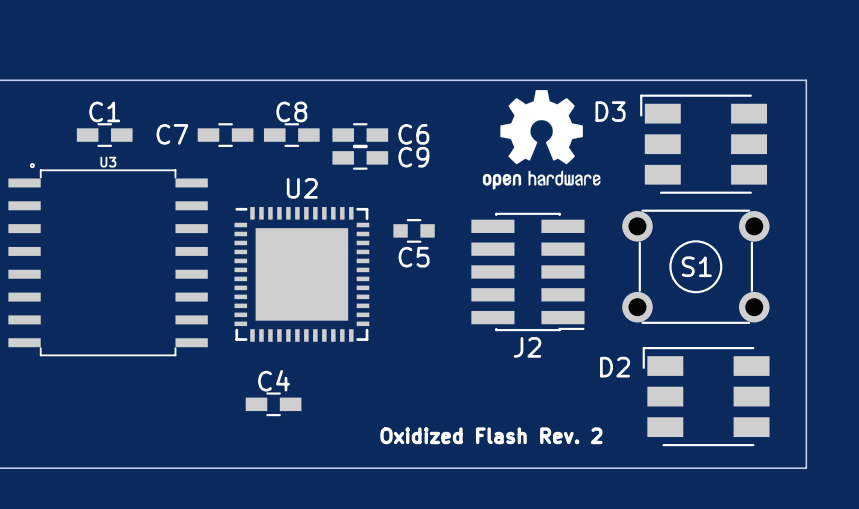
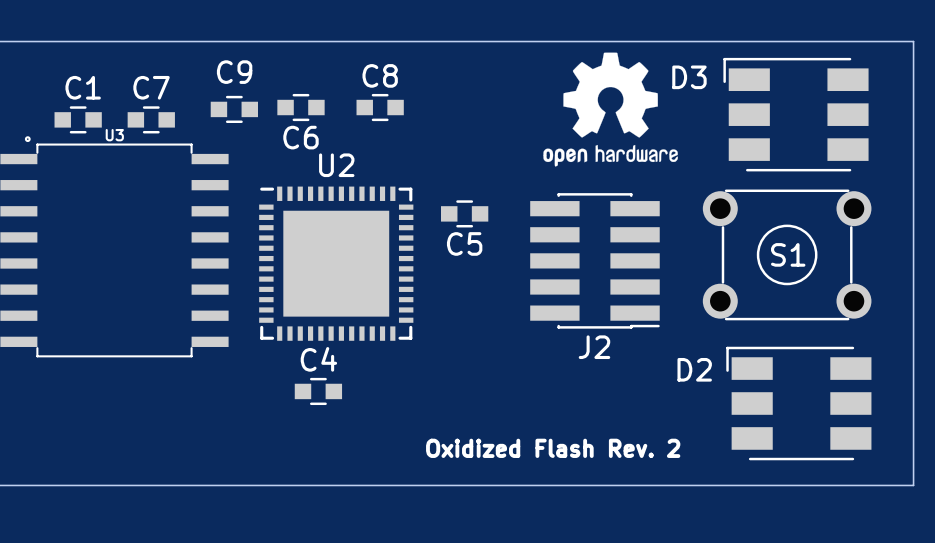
C1 footprint: [76, 123, 133, 147] -> [54, 106, 102, 134]
C7 footprint: [197, 123, 254, 147] -> [127, 106, 175, 134]
C8 footprint: [263, 123, 320, 147] -> [356, 93, 404, 122]
C6 footprint: [332, 123, 389, 147] -> [277, 93, 325, 122]
C7 name position: C7 (172, 134) -> C7 (151, 87)
C6 name position: C6 (413, 134) -> C6 (300, 137)
C9 footprint: [332, 146, 389, 170] -> [210, 95, 259, 124]
C9 name position: C9 (413, 157) -> C9 (234, 72)
C4 footprint: [245, 392, 302, 417] -> [294, 377, 343, 406]

